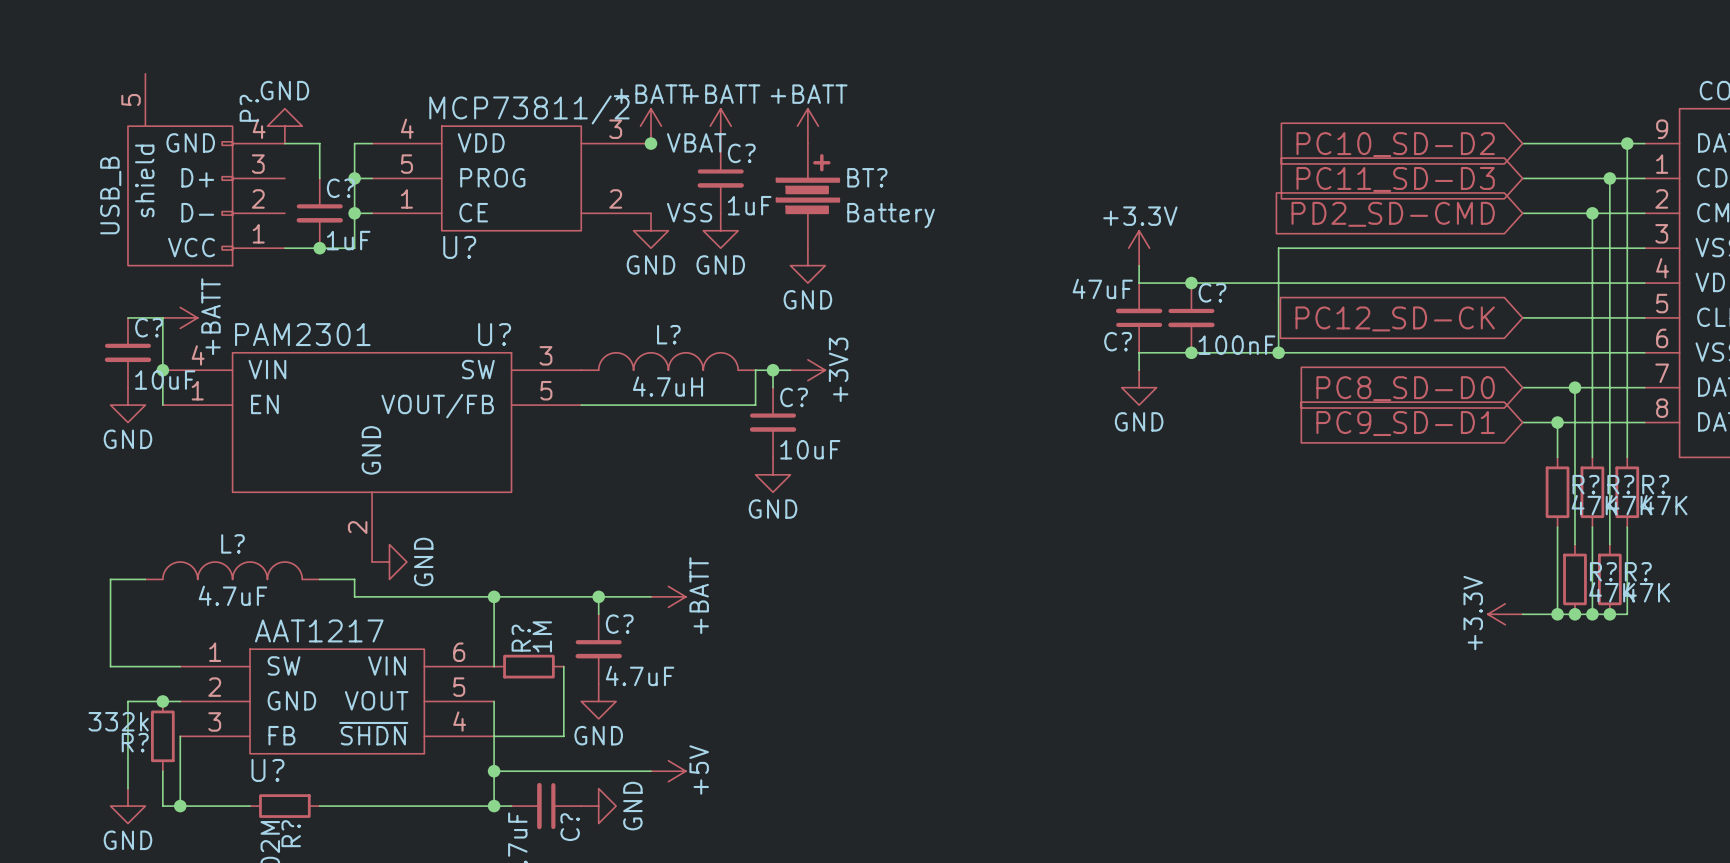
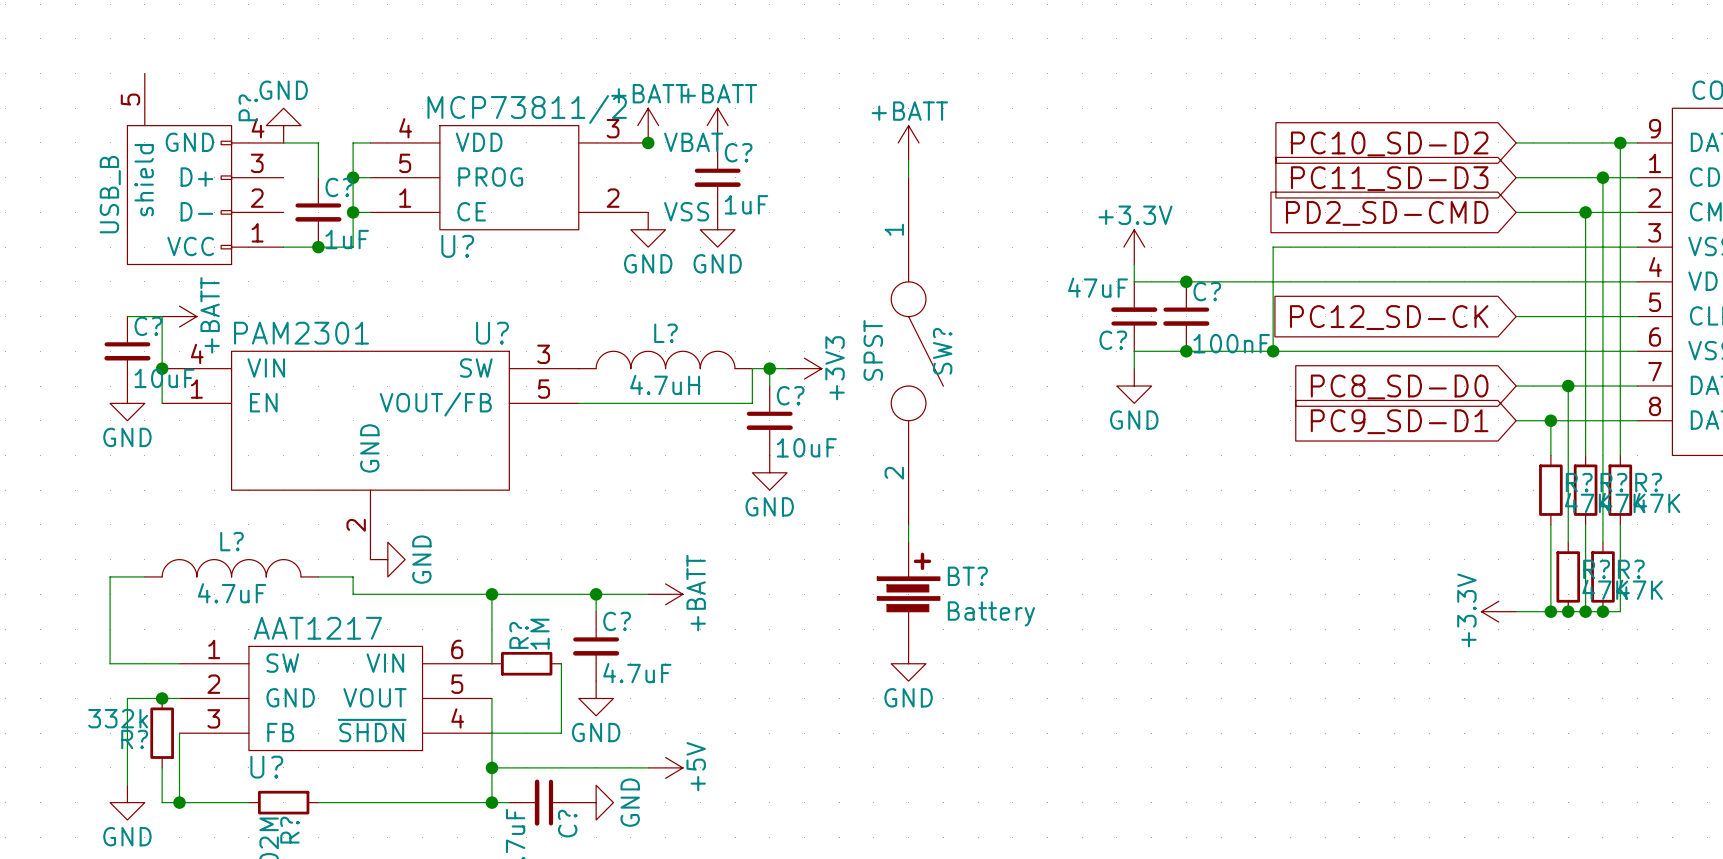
power symbol position: +BATT (807, 126) -> +BATT (908, 142)
wire: none -> (908, 160) (908, 177)
BT?: Battery (807, 195) -> none
power symbol: GND (807, 265) -> none
SW?: none -> SPST (917, 351)
wire: none -> (908, 524) (908, 542)
BT?: none -> Battery (908, 594)
power symbol: none -> GND (908, 663)

